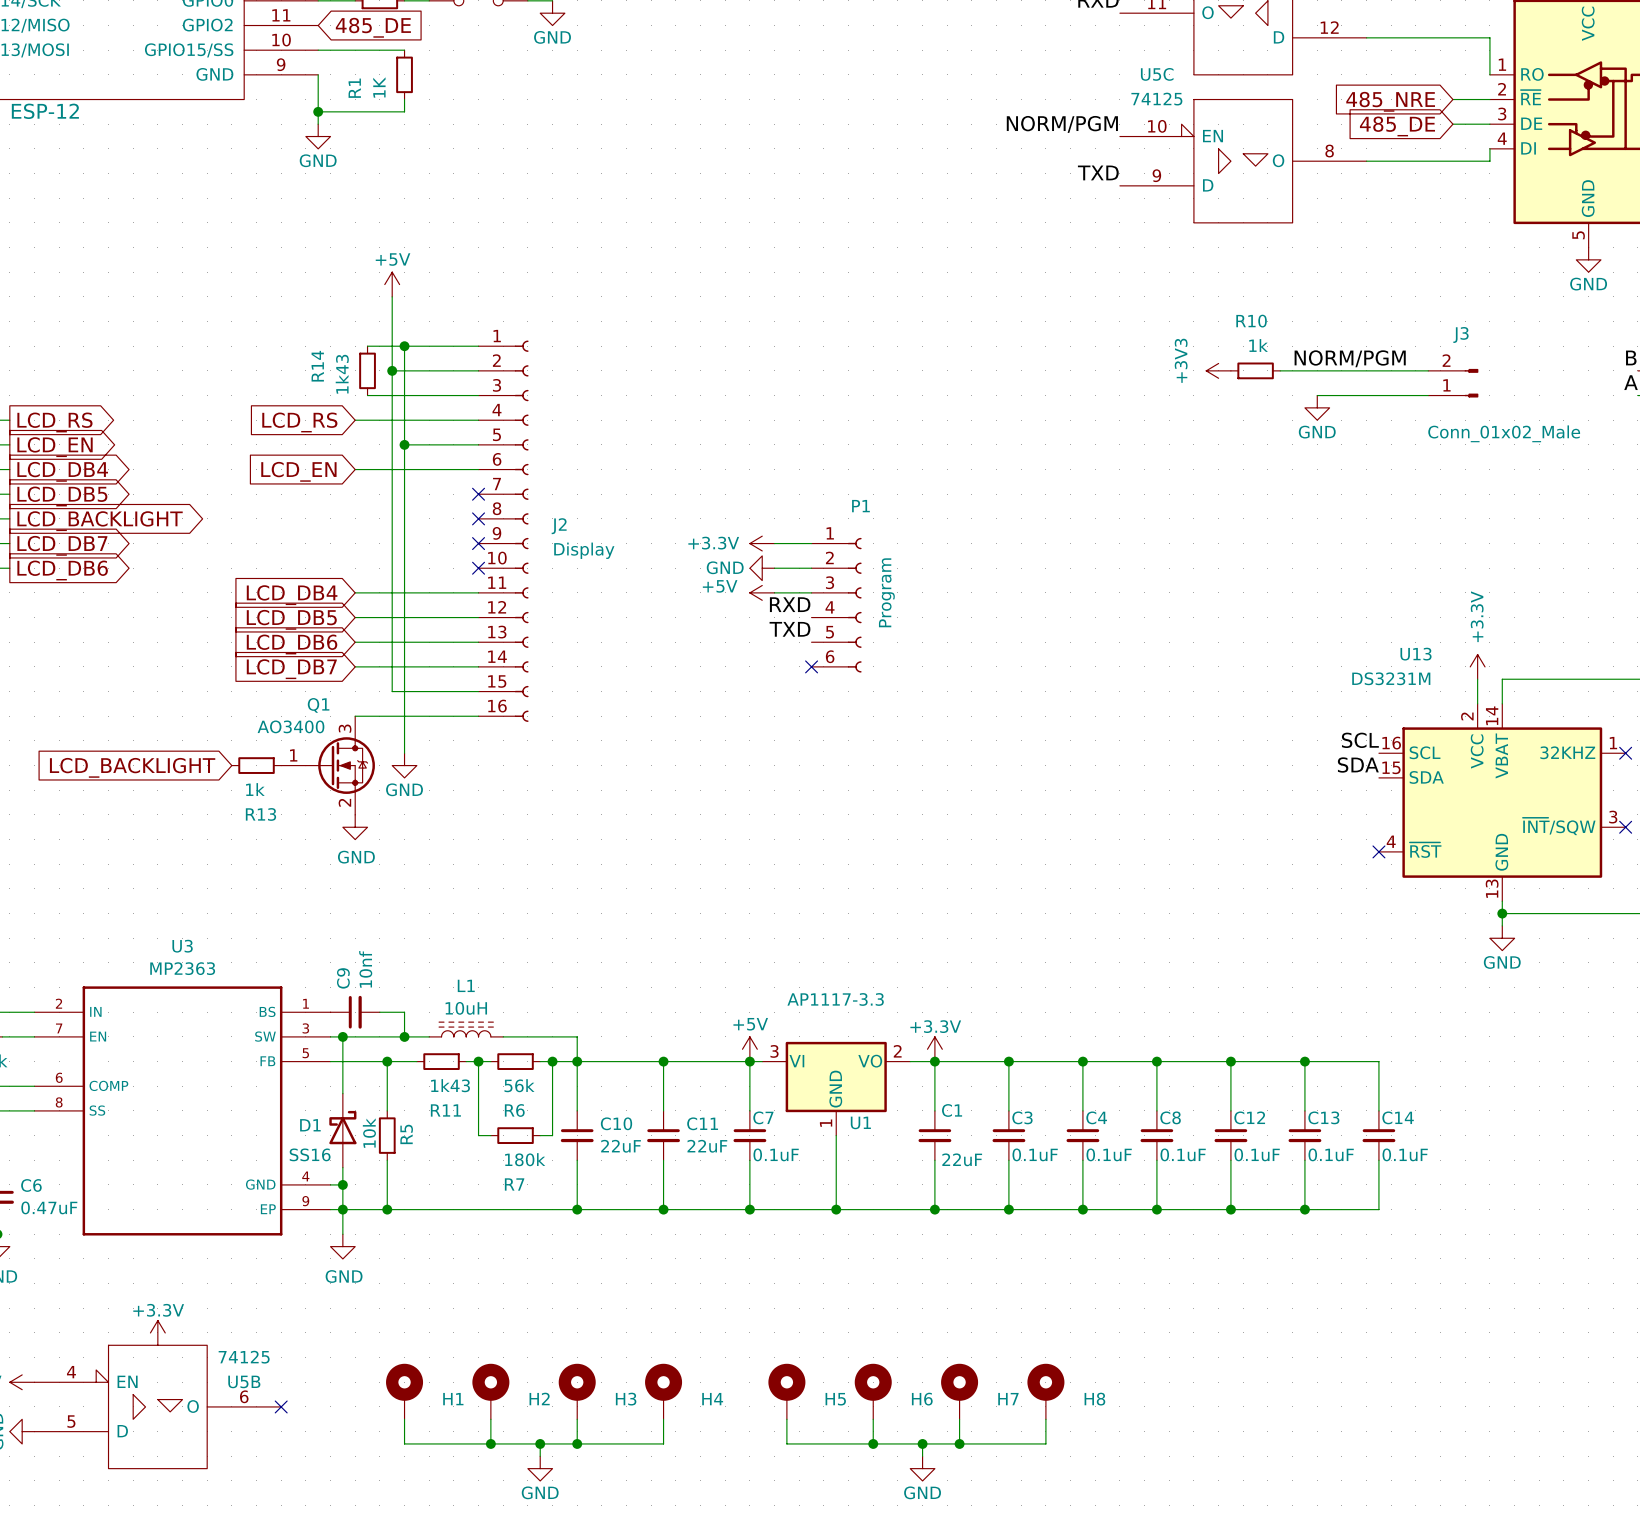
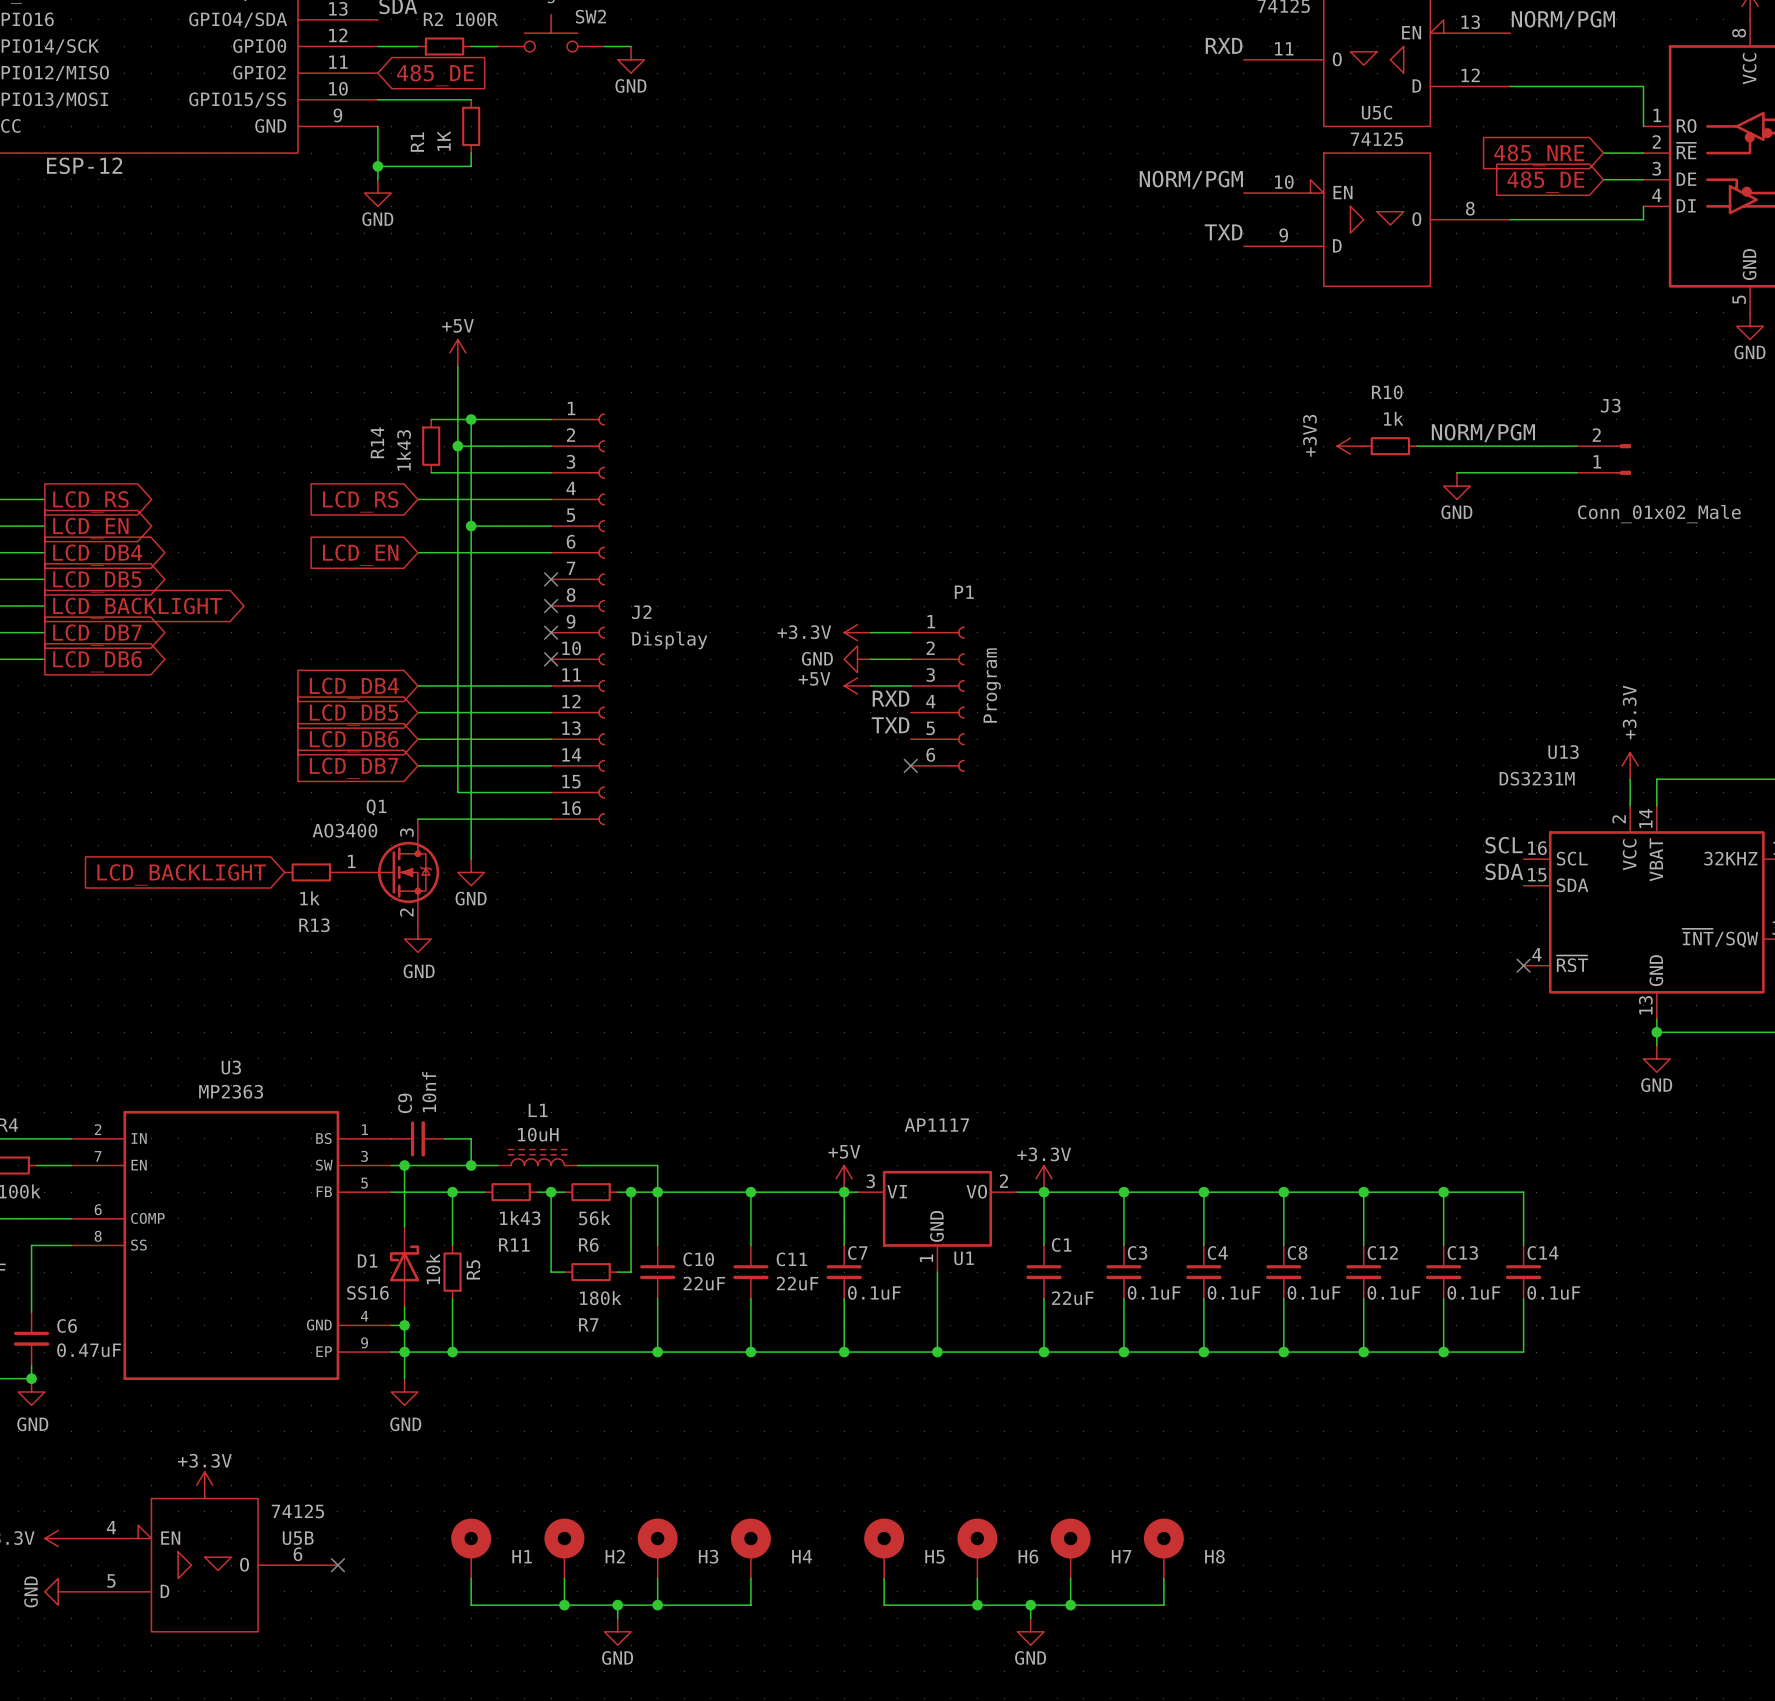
U5C name position: U5C (1157, 74) -> U5C (1377, 112)
U5C value position: 74125 (1156, 99) -> 74125 (1376, 139)
U1 value: AP1117-3.3 (835, 999) -> AP1117 (936, 1125)

